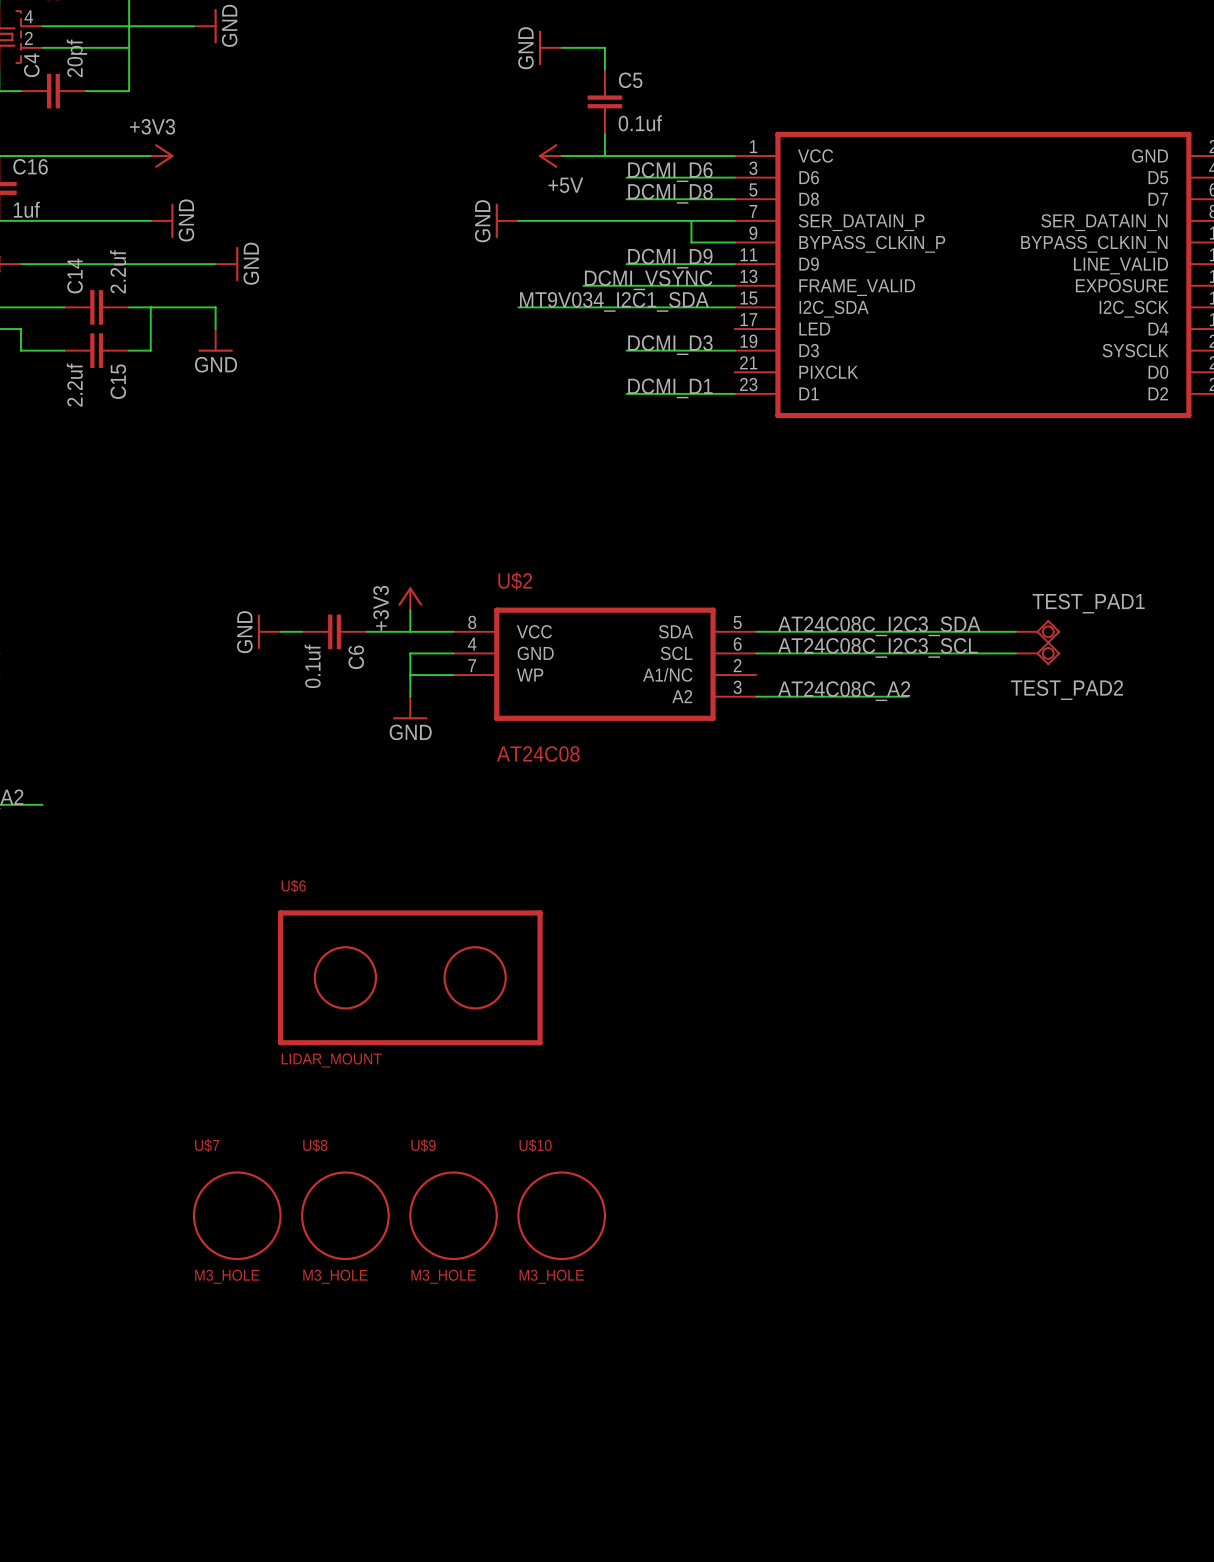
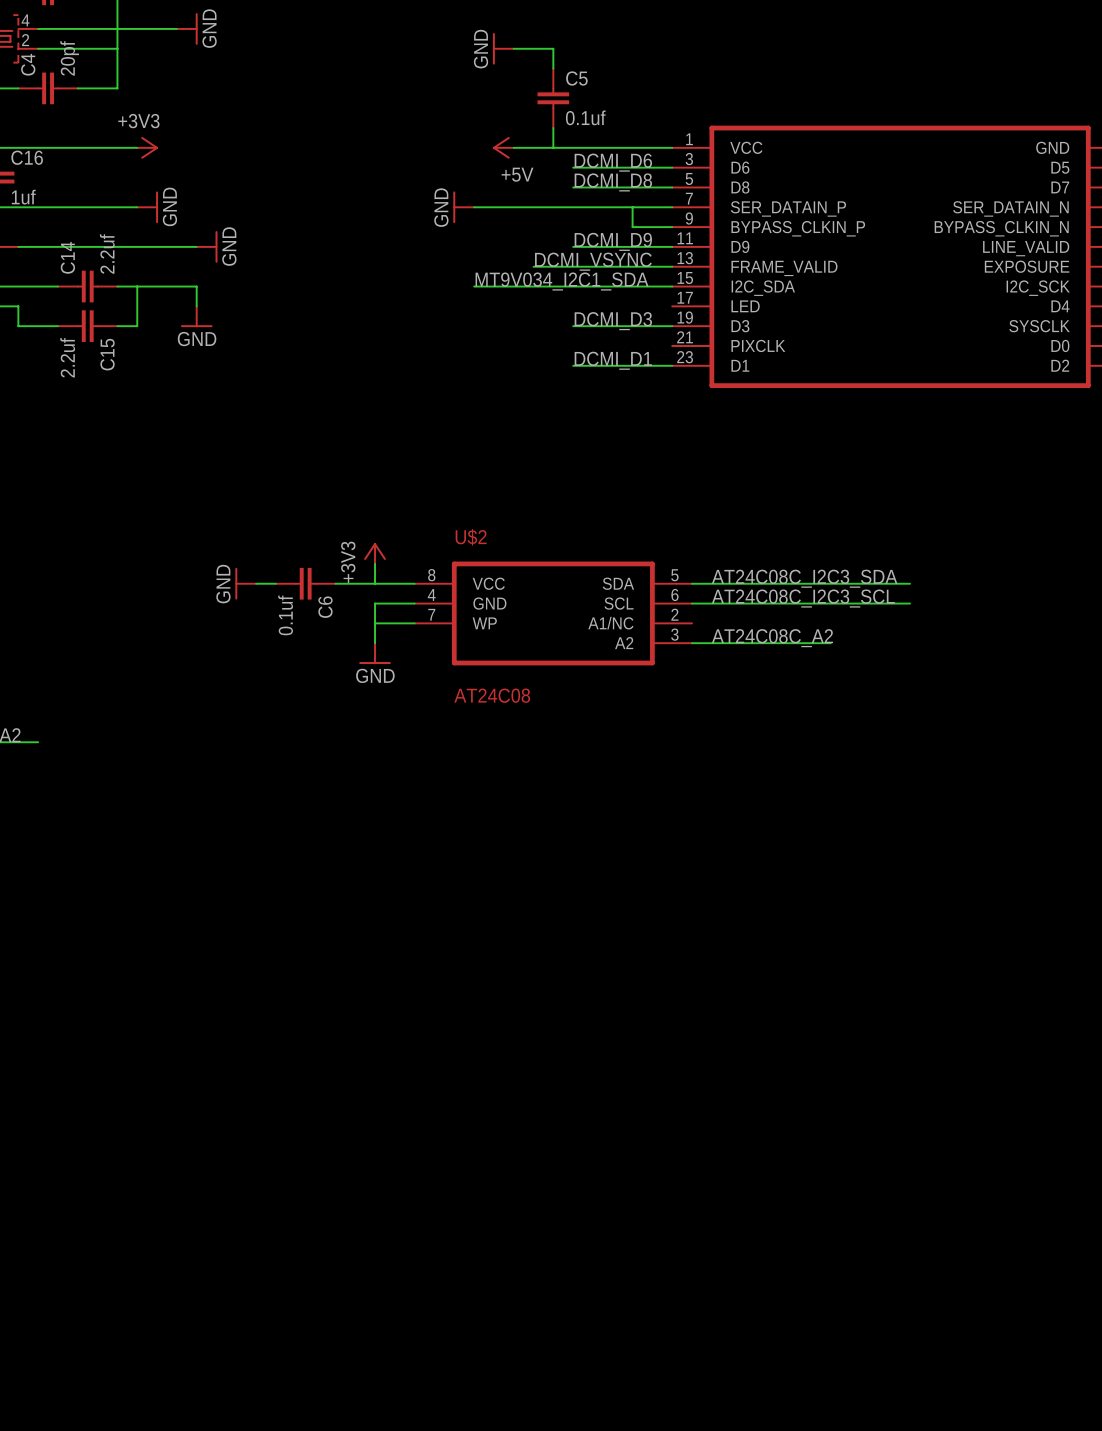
wire: (994, 631) (1015, 631) -> none
TEST_PAD1: (1037, 631) -> none
wire: (994, 653) (1015, 653) -> none
TEST_PAD2: (1037, 653) -> none
U$6: LIDAR_MOUNT (410, 977) -> none
U$7: M3_HOLE (237, 1215) -> none
U$8: M3_HOLE (345, 1215) -> none
U$9: M3_HOLE (453, 1215) -> none
U$10: M3_HOLE (561, 1215) -> none

